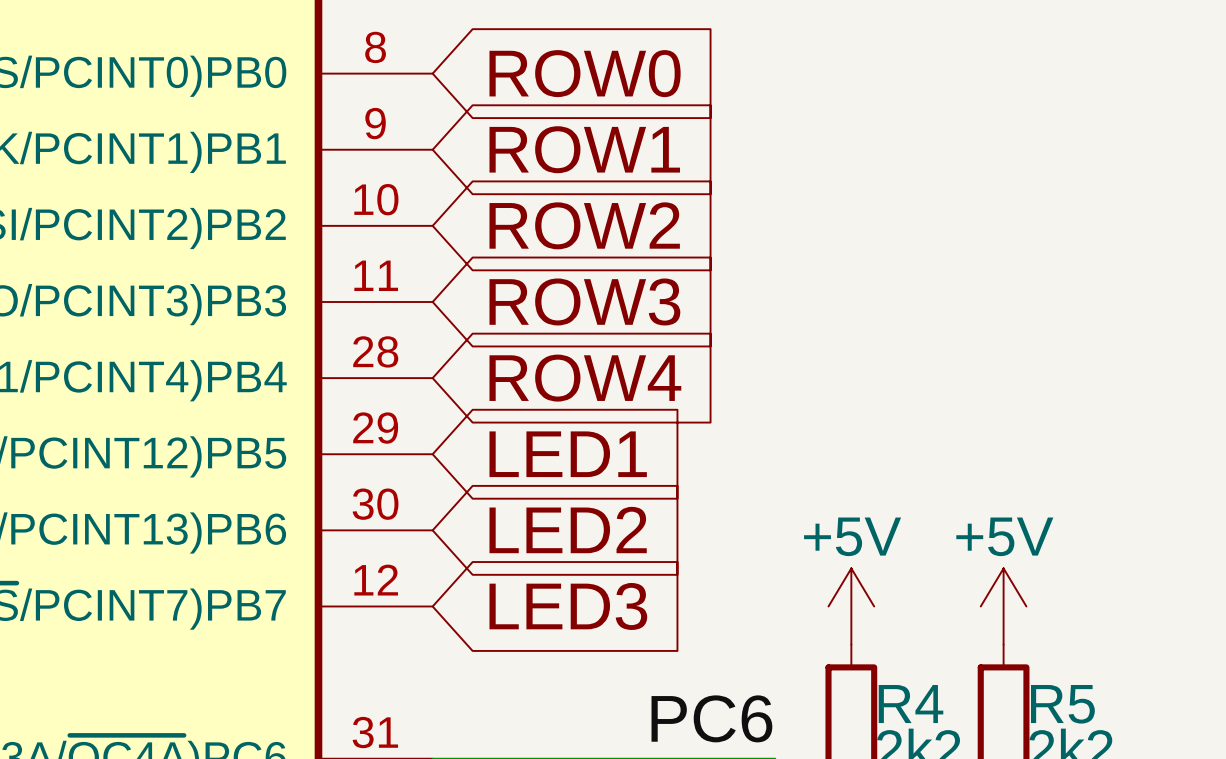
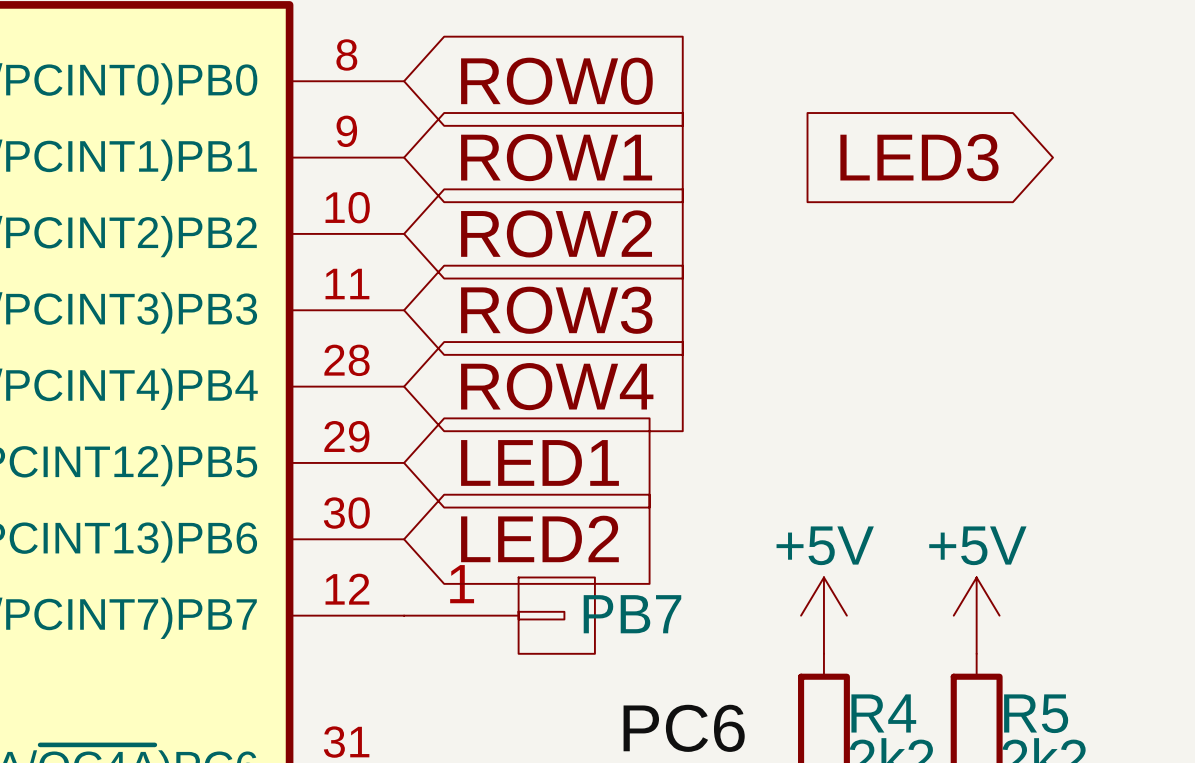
global label: none -> LED3 (919, 157)
PB7: none -> (499, 615)
global label: LED3 (568, 606) -> none

